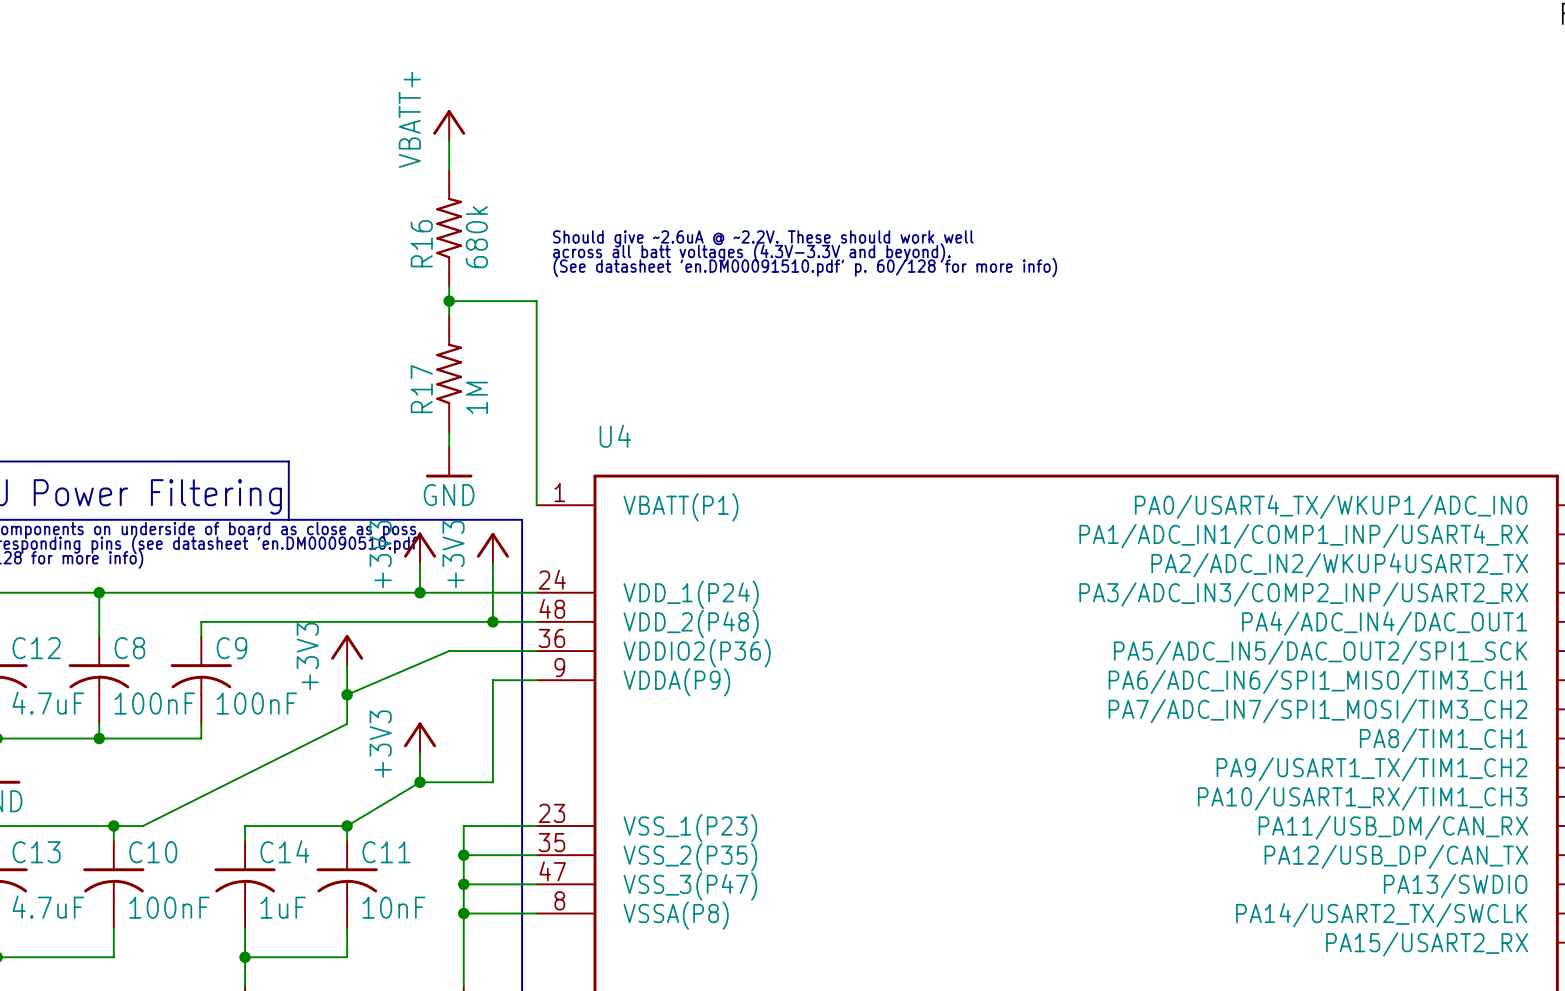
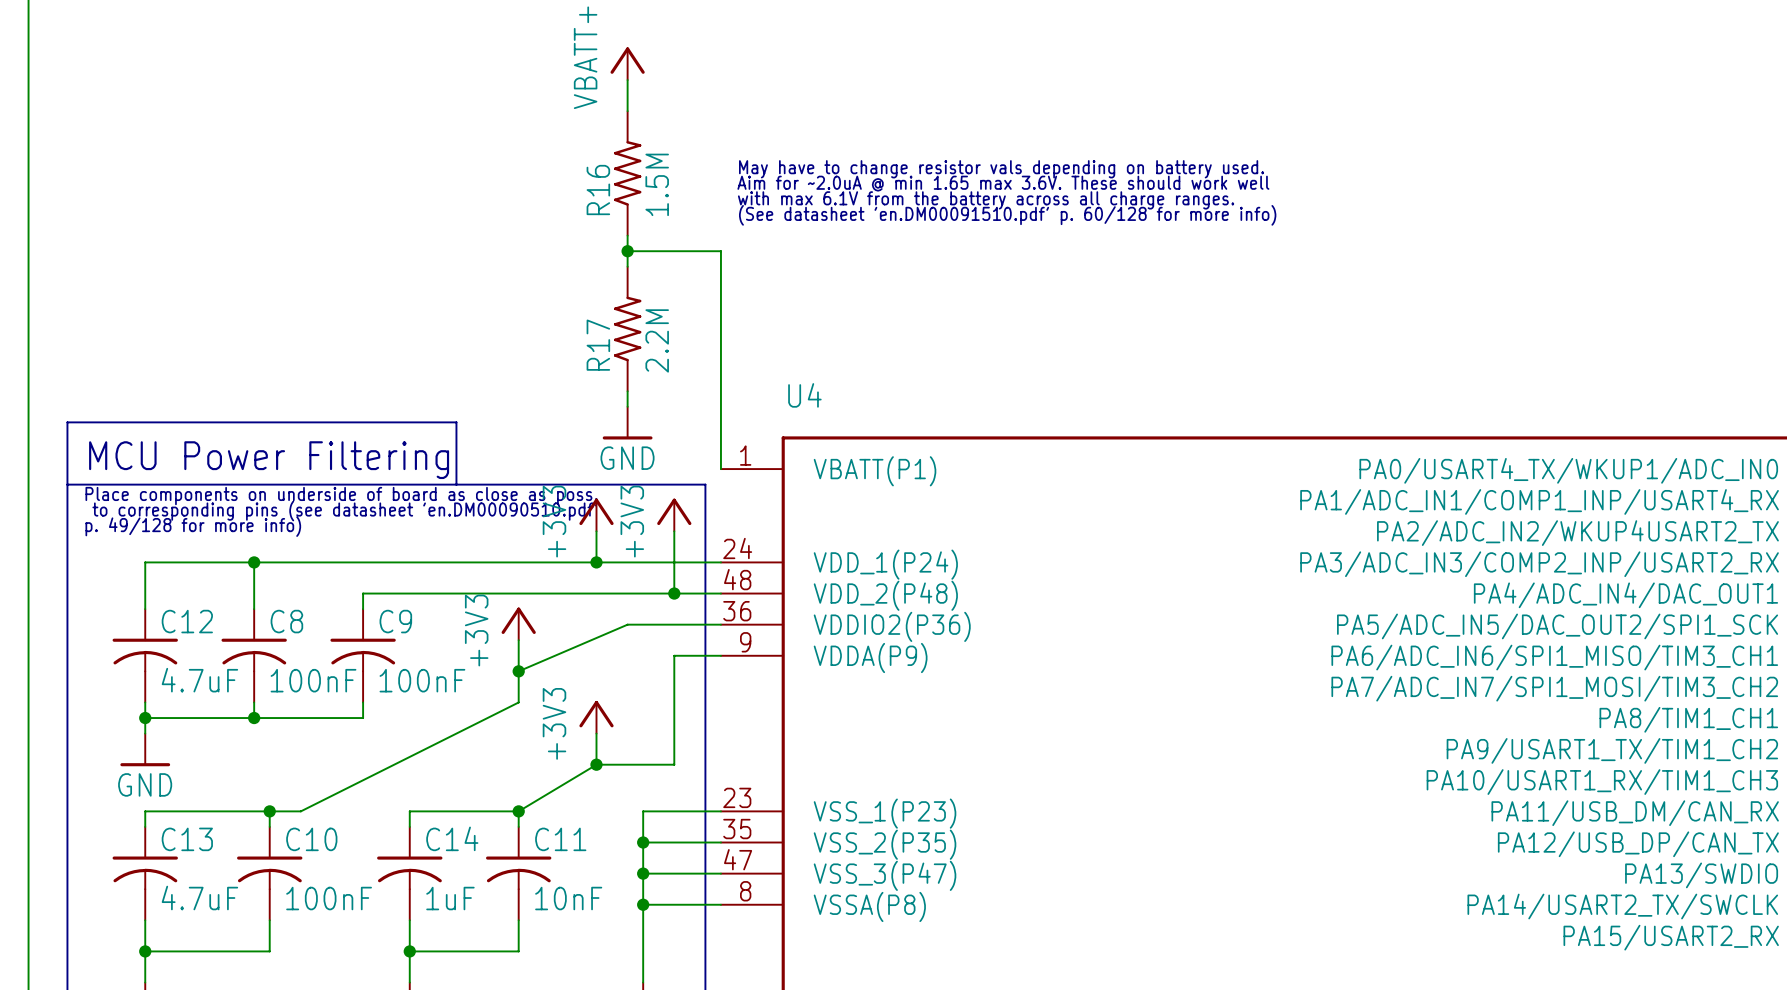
text: none -> May have to change resistor vals depending on battery used. (1001, 169)
R16 value: 680k (476, 237) -> 1.5M (657, 184)
text: Should give ~2.6uA @ ~2.2V. These should work well (763, 238) -> Aim for ~2.0uA @ min 1.65 max 3.6V. These should work well (1003, 183)
text: across all batt voltages (4.3V-3.3V and beyond). (751, 252) -> with max 6.1V from the battery across all charge ranges. (986, 200)
R17 value: 1M (476, 397) -> 2.2M (657, 340)

